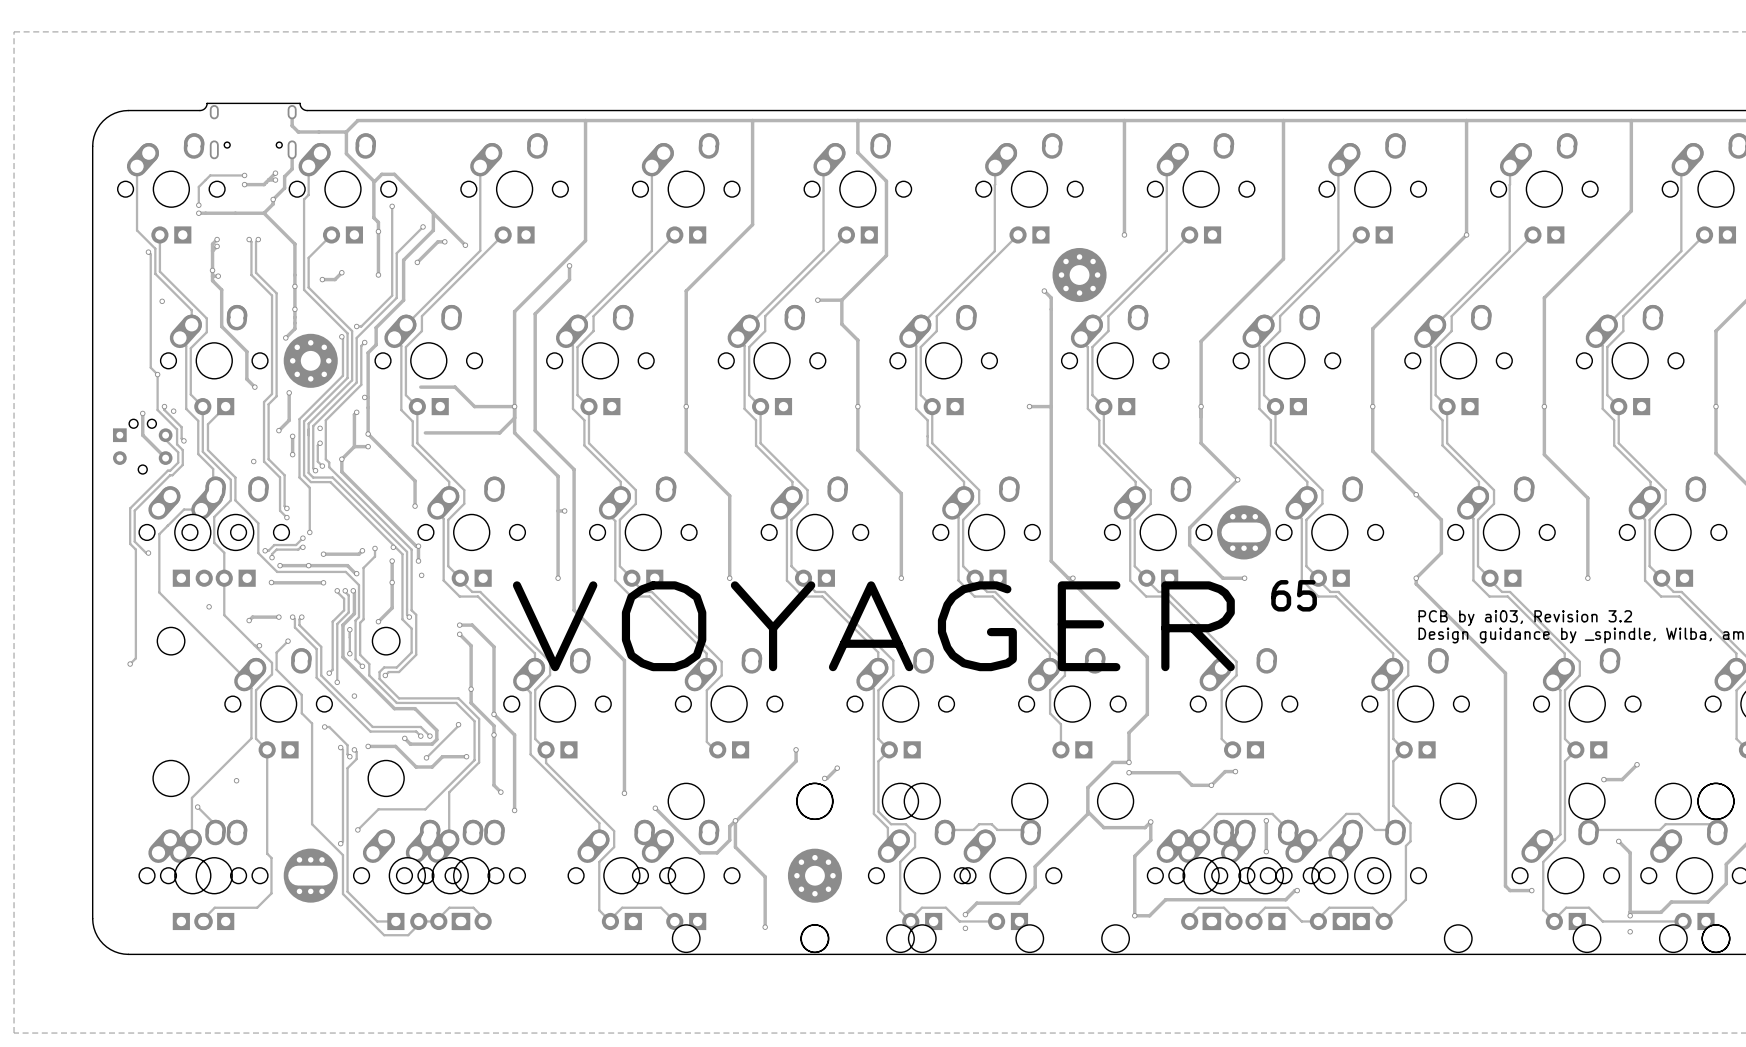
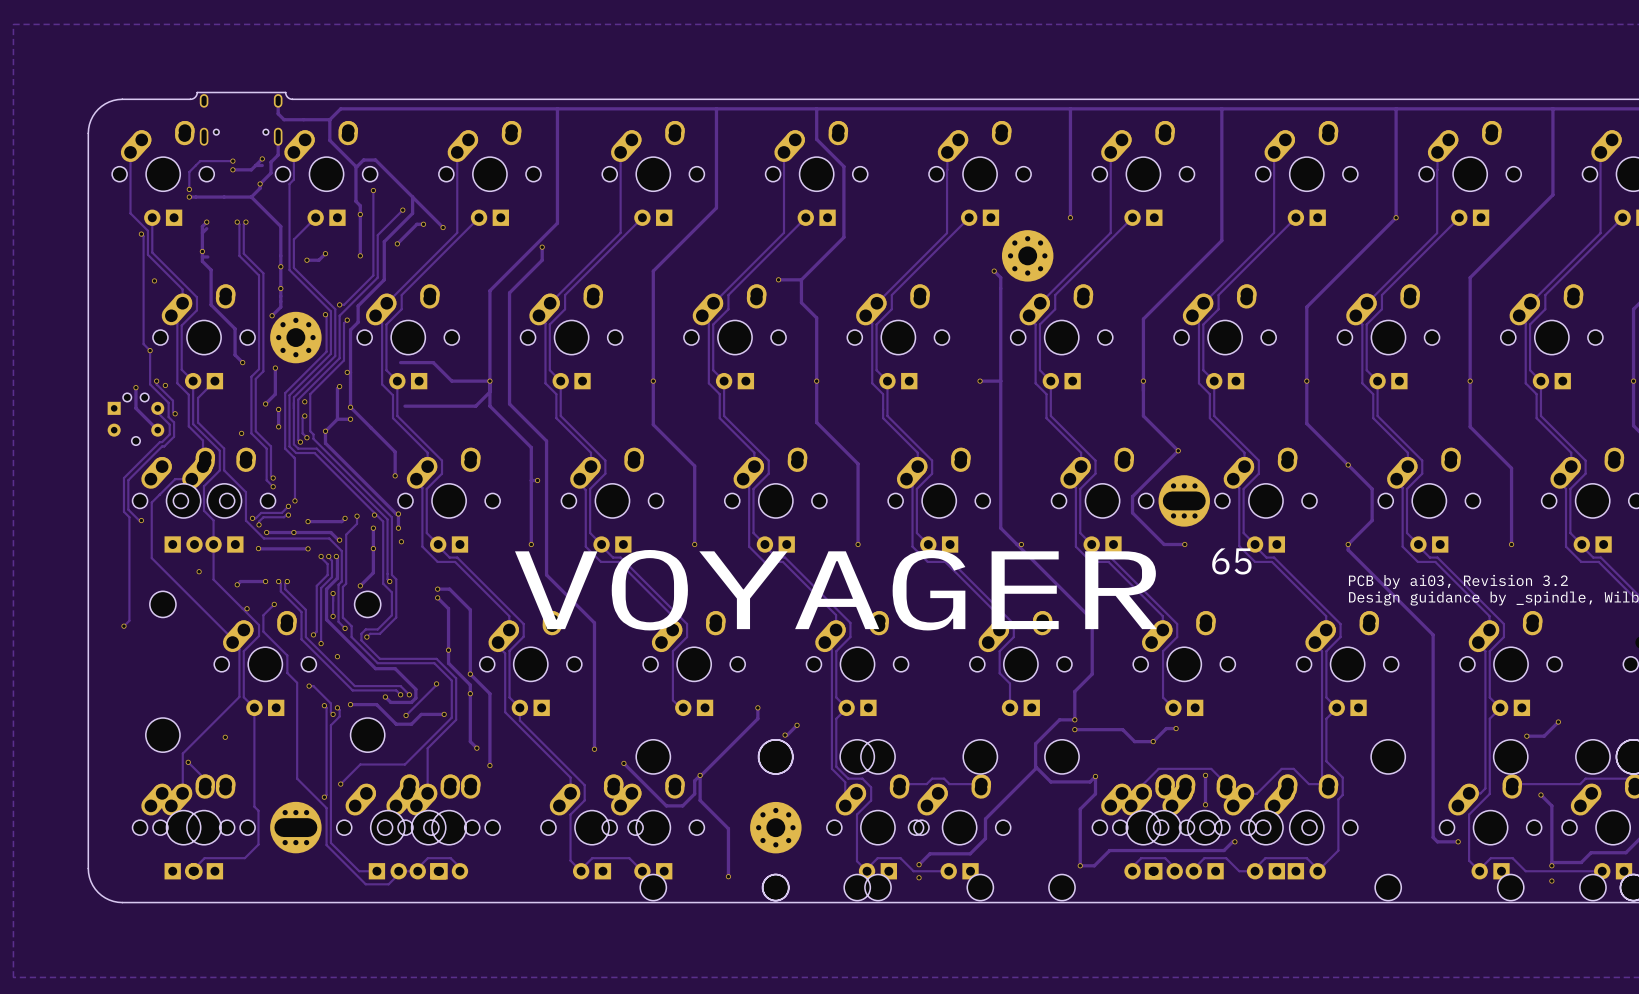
via: (275, 180) -> none
via: (217, 246) -> none
via: (218, 276) -> none

